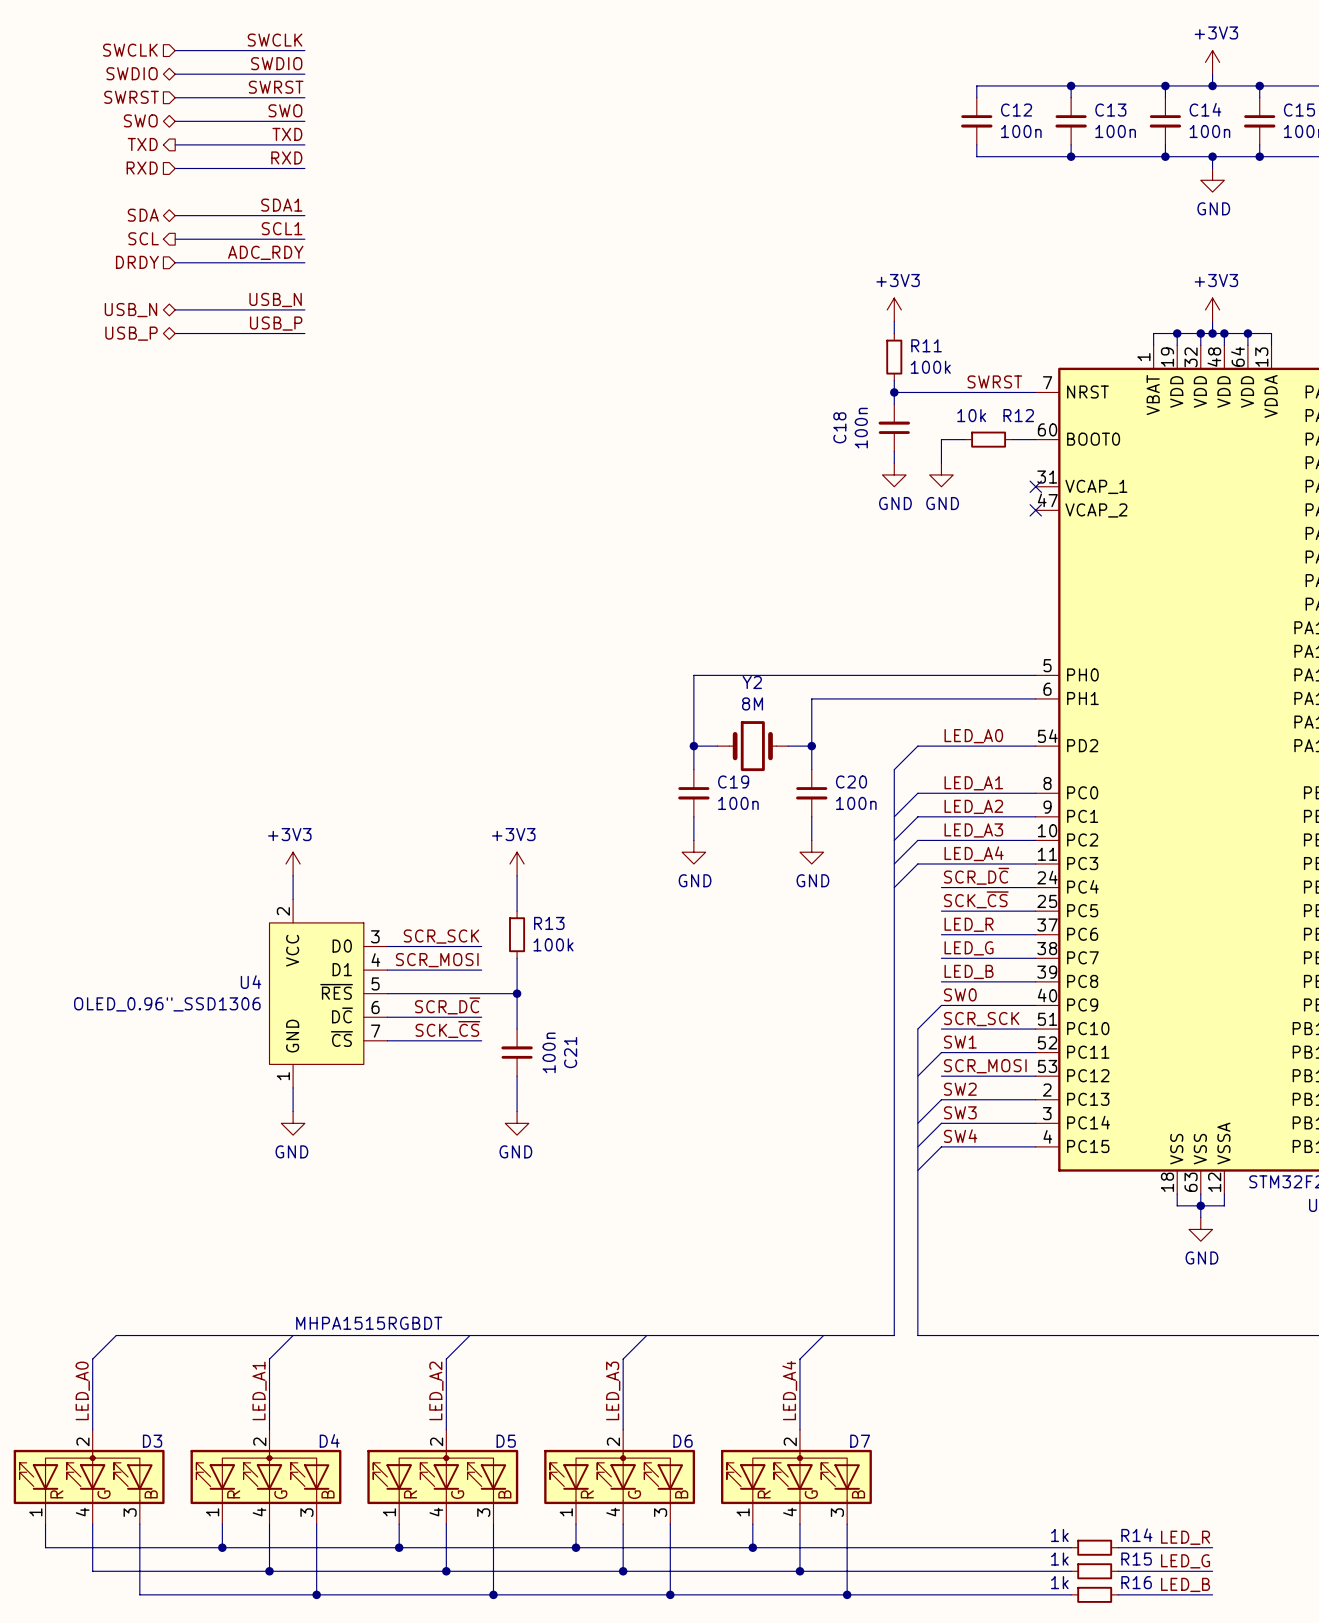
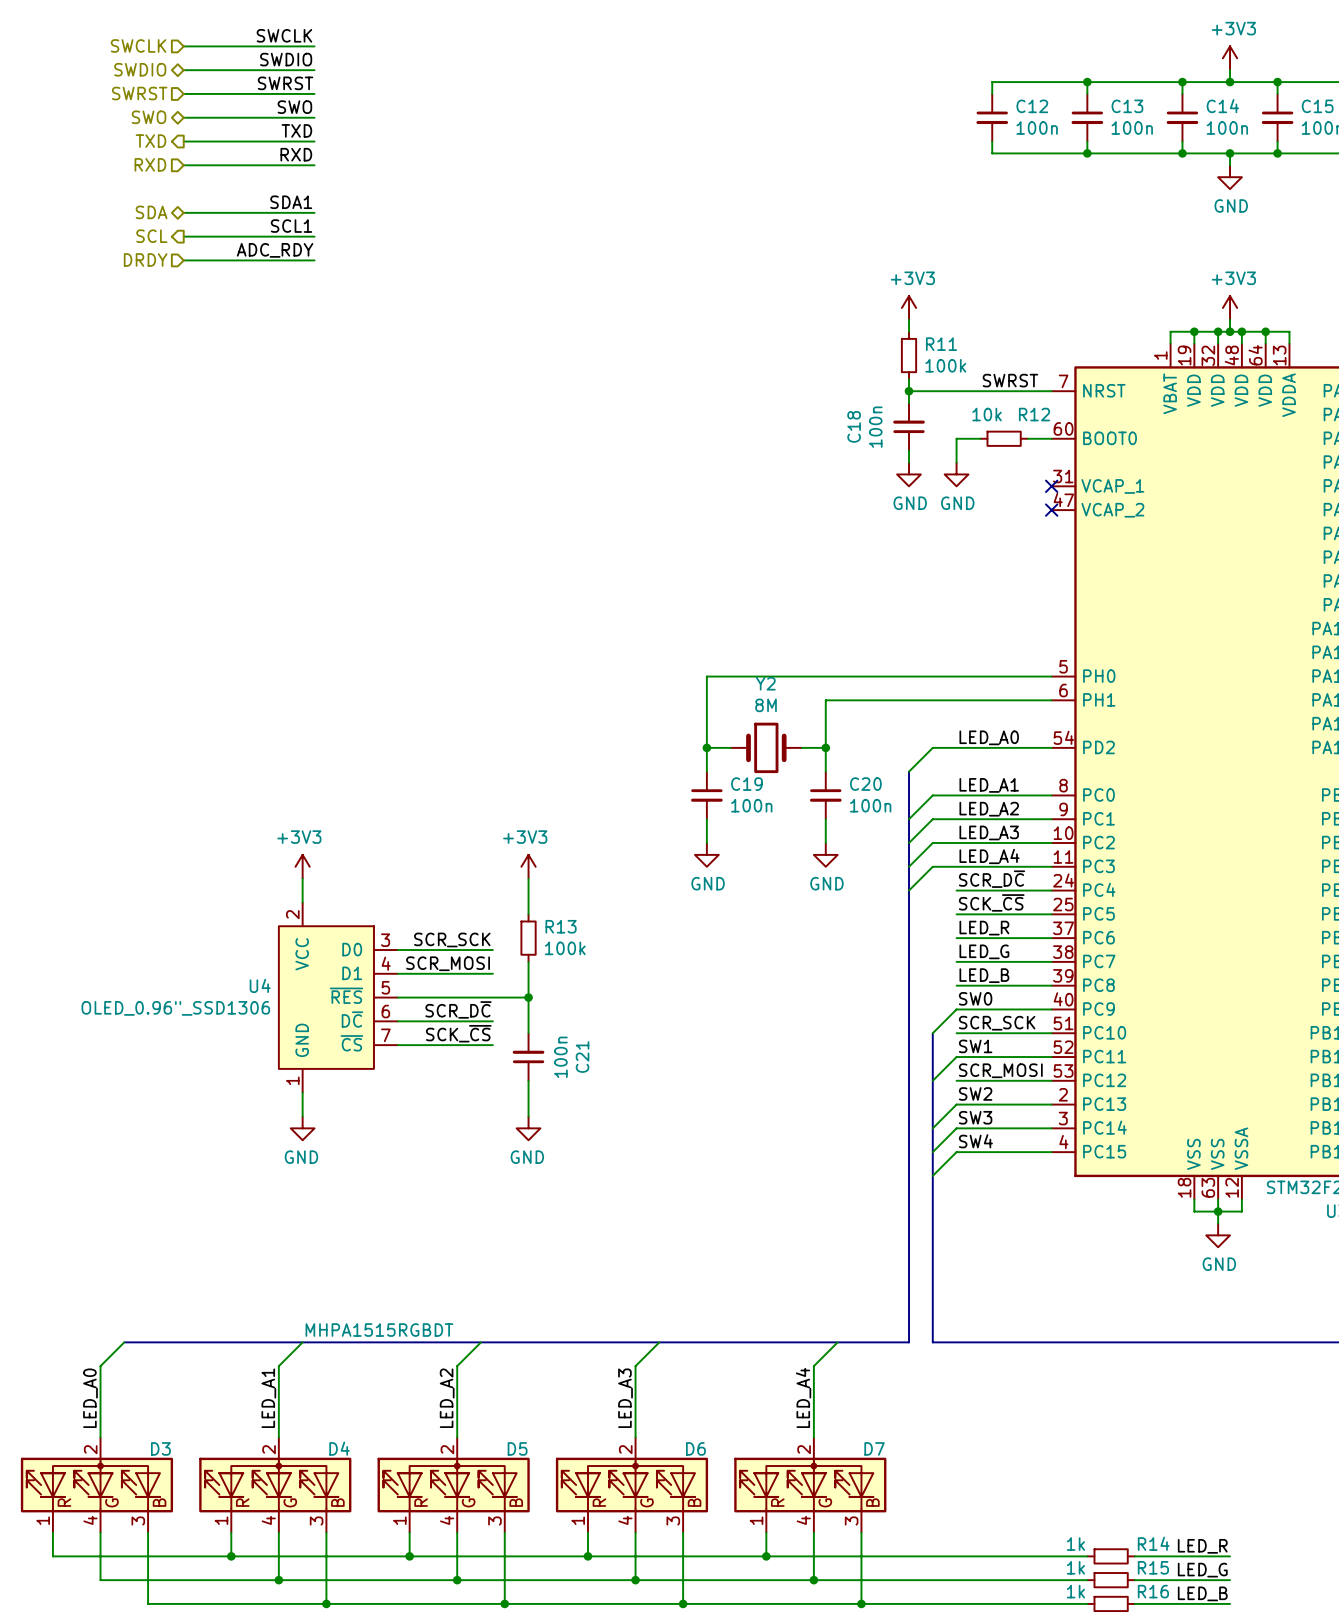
label: USB_N (275, 299) -> none
wire: (175, 309) (304, 309) -> none
hierarchical label: USB_N (130, 310) -> none
label: USB_P (276, 323) -> none
hierarchical label: USB_P (131, 333) -> none
wire: (175, 333) (304, 333) -> none

